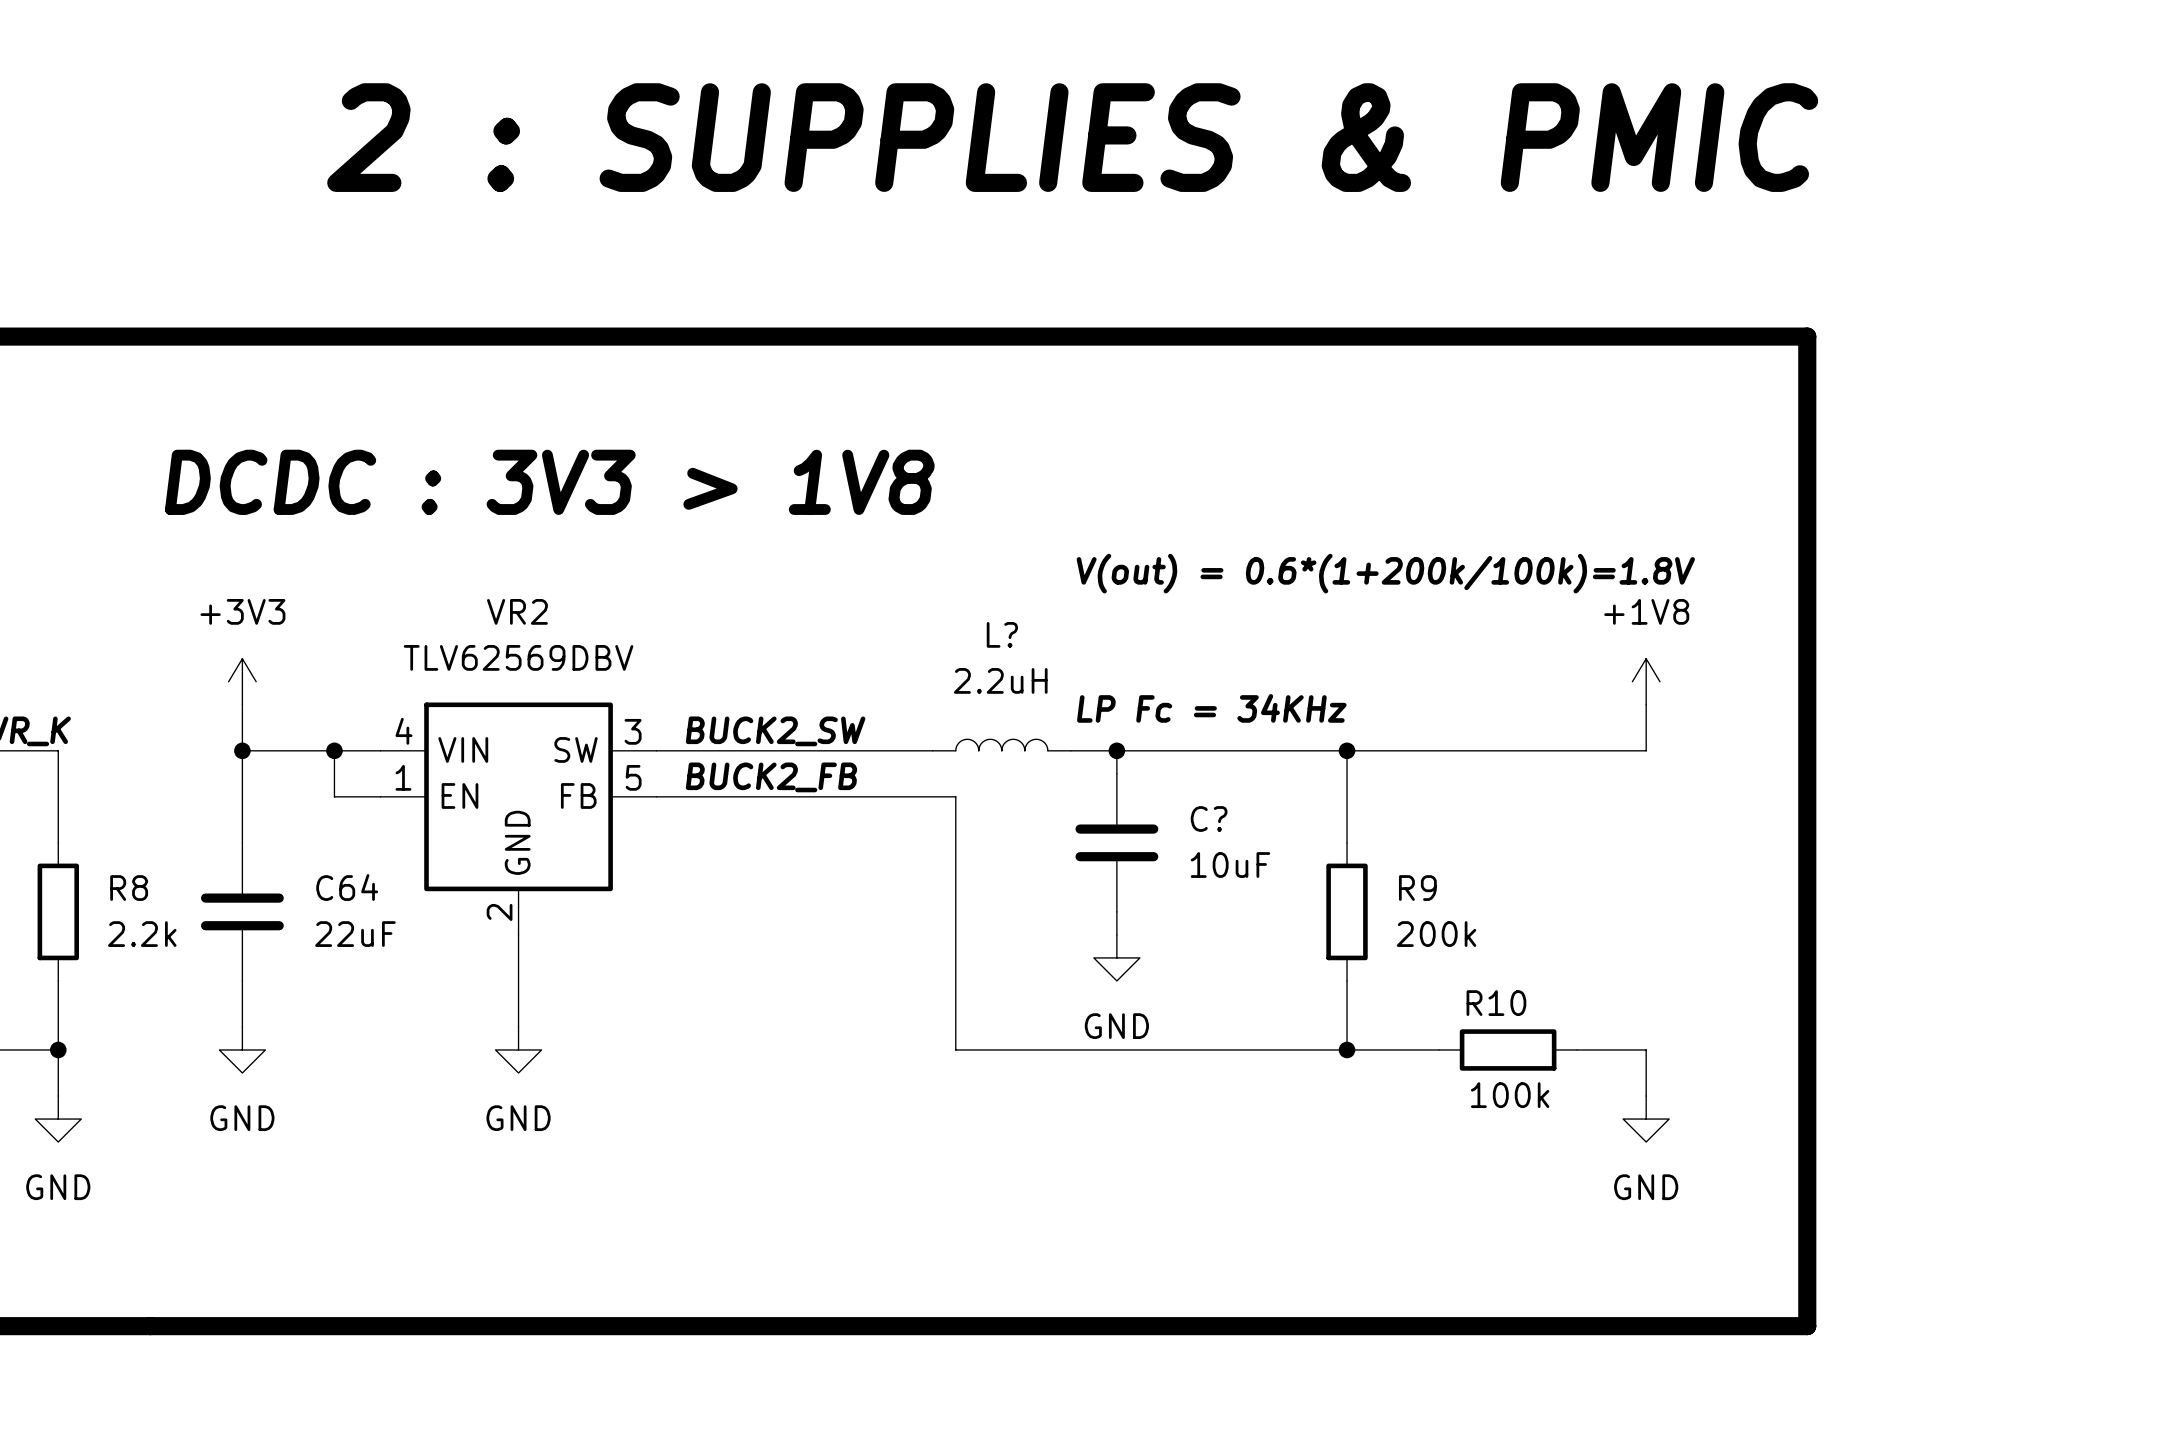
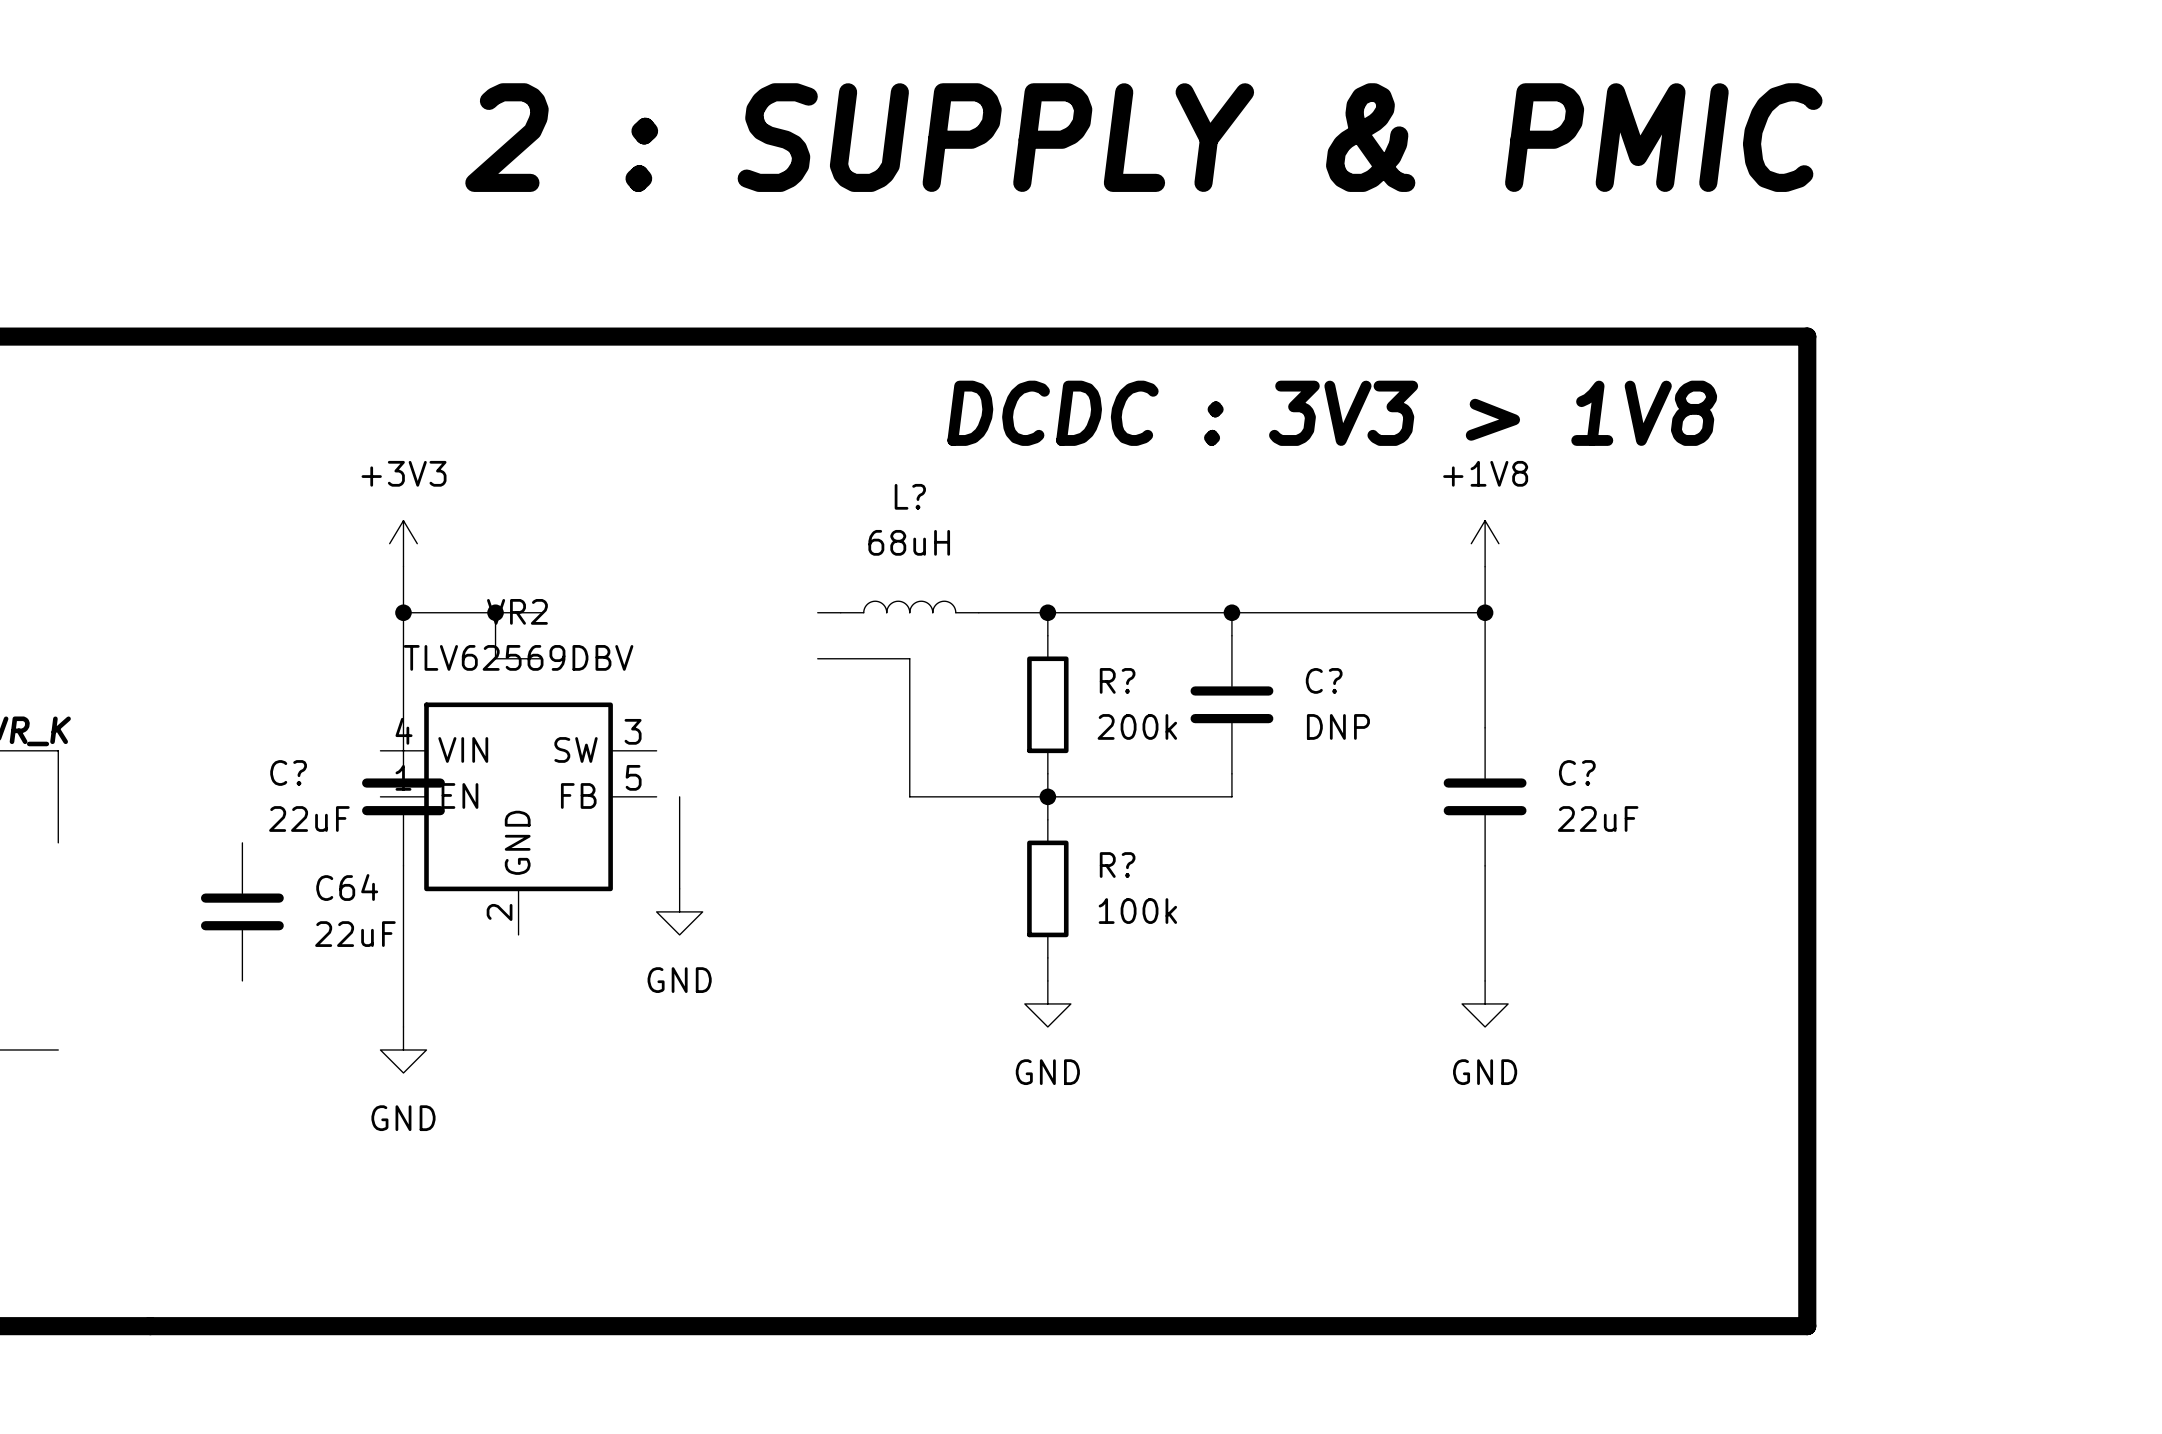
text: 2 : SUPPLIES & PMIC (1072, 137) -> 2 : SUPPLY & PMIC (1143, 137)
text: none -> DCDC : 3V3 > 1V8 (1332, 413)
text: DCDC : 3V3 > 1V8 (549, 482) -> none
wire: none -> (403, 566) (403, 727)
wire: none -> (1485, 566) (1485, 727)
text: V(out) = 0.6*(1+200k/100k)=1.8V (1385, 573) -> none
L?: none -> 68uH (909, 606)
junction: none -> (403, 612)
junction: none -> (495, 612)
wire: none -> (817, 612) (840, 612)
wire: none -> (978, 612) (1485, 612)
junction: none -> (1047, 612)
wire: none -> (1231, 612) (1231, 635)
junction: none -> (1231, 612)
junction: none -> (1485, 612)
power symbol position: +3V3 (242, 681) -> +3V3 (403, 543)
power symbol position: +1V8 (1646, 681) -> +1V8 (1485, 543)
wire: (242, 704) (242, 842) -> none
R?: none -> 200k (1047, 704)
C?: none -> DNP (1231, 704)
wire: (1646, 704) (1646, 750) (1070, 750) -> none
text: LP Fc = 34KHz (1211, 708) -> none
label: BUCK2_SW (775, 731) -> none
L?: 2.2uH (1001, 745) -> none
wire: (242, 750) (380, 750) -> (403, 612) (541, 612)
junction: (242, 750) -> none
wire: (334, 750) (334, 796) (380, 796) -> (495, 612) (495, 658) (541, 658)
junction: (334, 750) -> none
wire: (656, 750) (932, 750) -> none
wire: (1116, 750) (1116, 773) -> (1047, 612) (1047, 635)
junction: (1116, 750) -> none
wire: (1347, 750) (1347, 842) -> none
junction: (1347, 750) -> none
wire: none -> (1047, 773) (1047, 819)
label: BUCK2_FB (771, 777) -> none
C?: none -> 22uF (403, 796)
wire: (656, 796) (909, 796) -> (817, 658) (909, 658) (909, 796)
wire: (955, 796) (955, 1049) (1439, 1049) -> (955, 796) (1231, 796) (1231, 773)
junction: none -> (1047, 796)
C?: none -> 22uF (1485, 796)
C?: 10uF (1116, 842) -> none
wire: none -> (403, 865) (403, 1026)
wire: none -> (1485, 865) (1485, 980)
R?: none -> 100k (1047, 888)
R8: 2.2k (58, 911) -> none
power symbol: none -> GND (679, 911)
wire: (1116, 911) (1116, 934) -> (1047, 957) (1047, 980)
R9: 200k (1347, 911) -> none
wire: (518, 934) (518, 1026) -> (679, 796) (679, 888)
power symbol position: GND (1116, 957) -> GND (1047, 1003)
wire: (58, 980) (58, 1096) -> none
wire: (242, 980) (242, 1026) -> none
wire: (1347, 980) (1347, 1049) -> none
power symbol: none -> GND (1485, 1003)
junction: (58, 1049) -> none
power symbol: GND (242, 1049) -> none
power symbol: none -> GND (403, 1049)
power symbol: GND (518, 1049) -> none
junction: (1347, 1049) -> none
R10: 100k (1508, 1049) -> none
wire: (1577, 1049) (1646, 1049) (1646, 1096) -> none
power symbol: GND (58, 1119) -> none
power symbol: GND (1646, 1119) -> none

